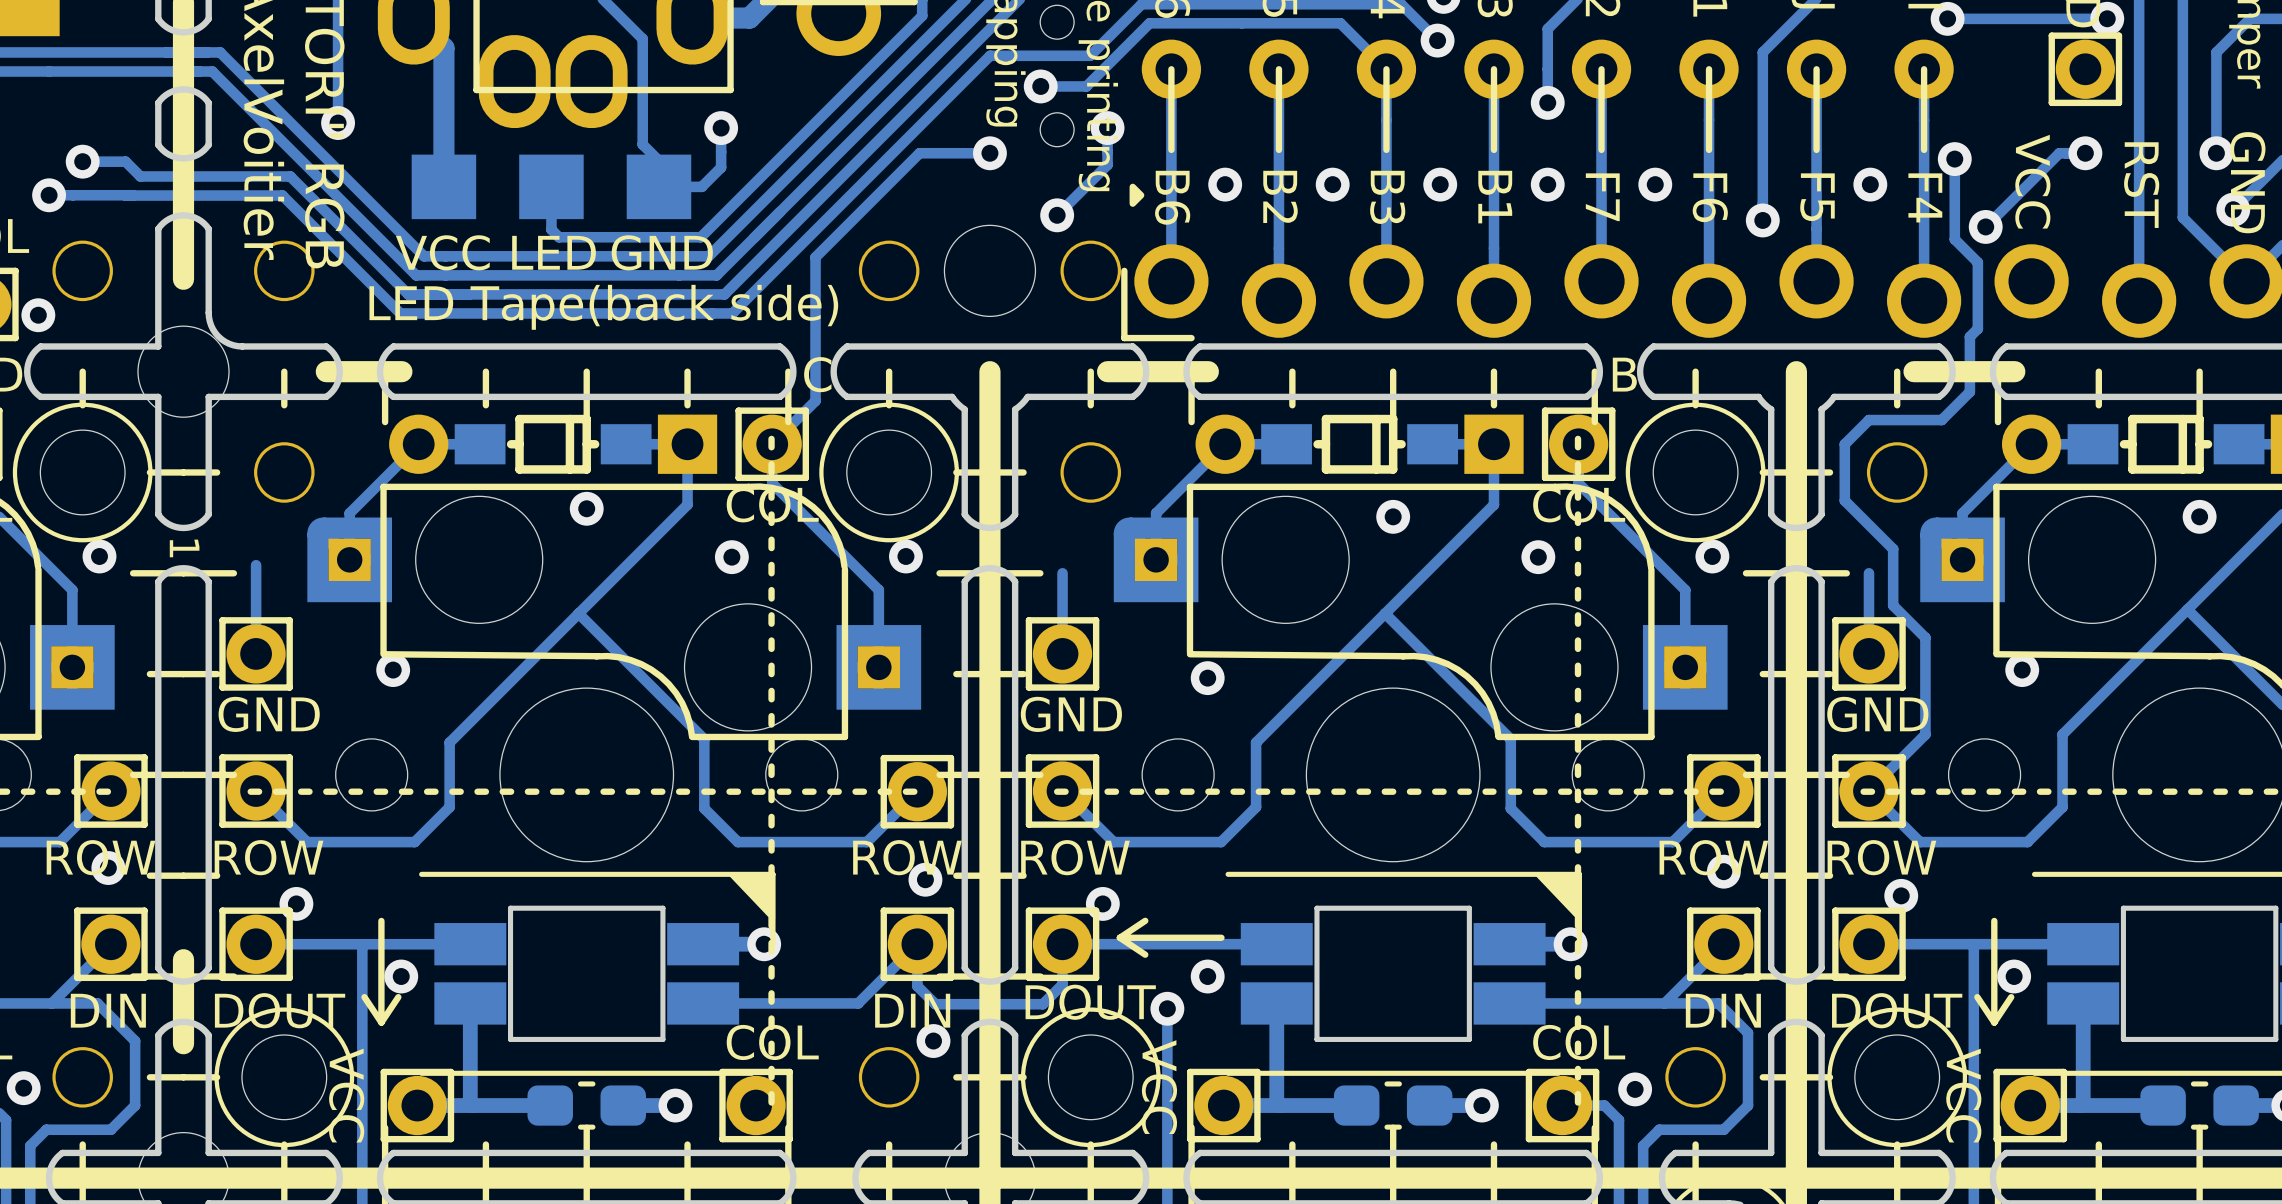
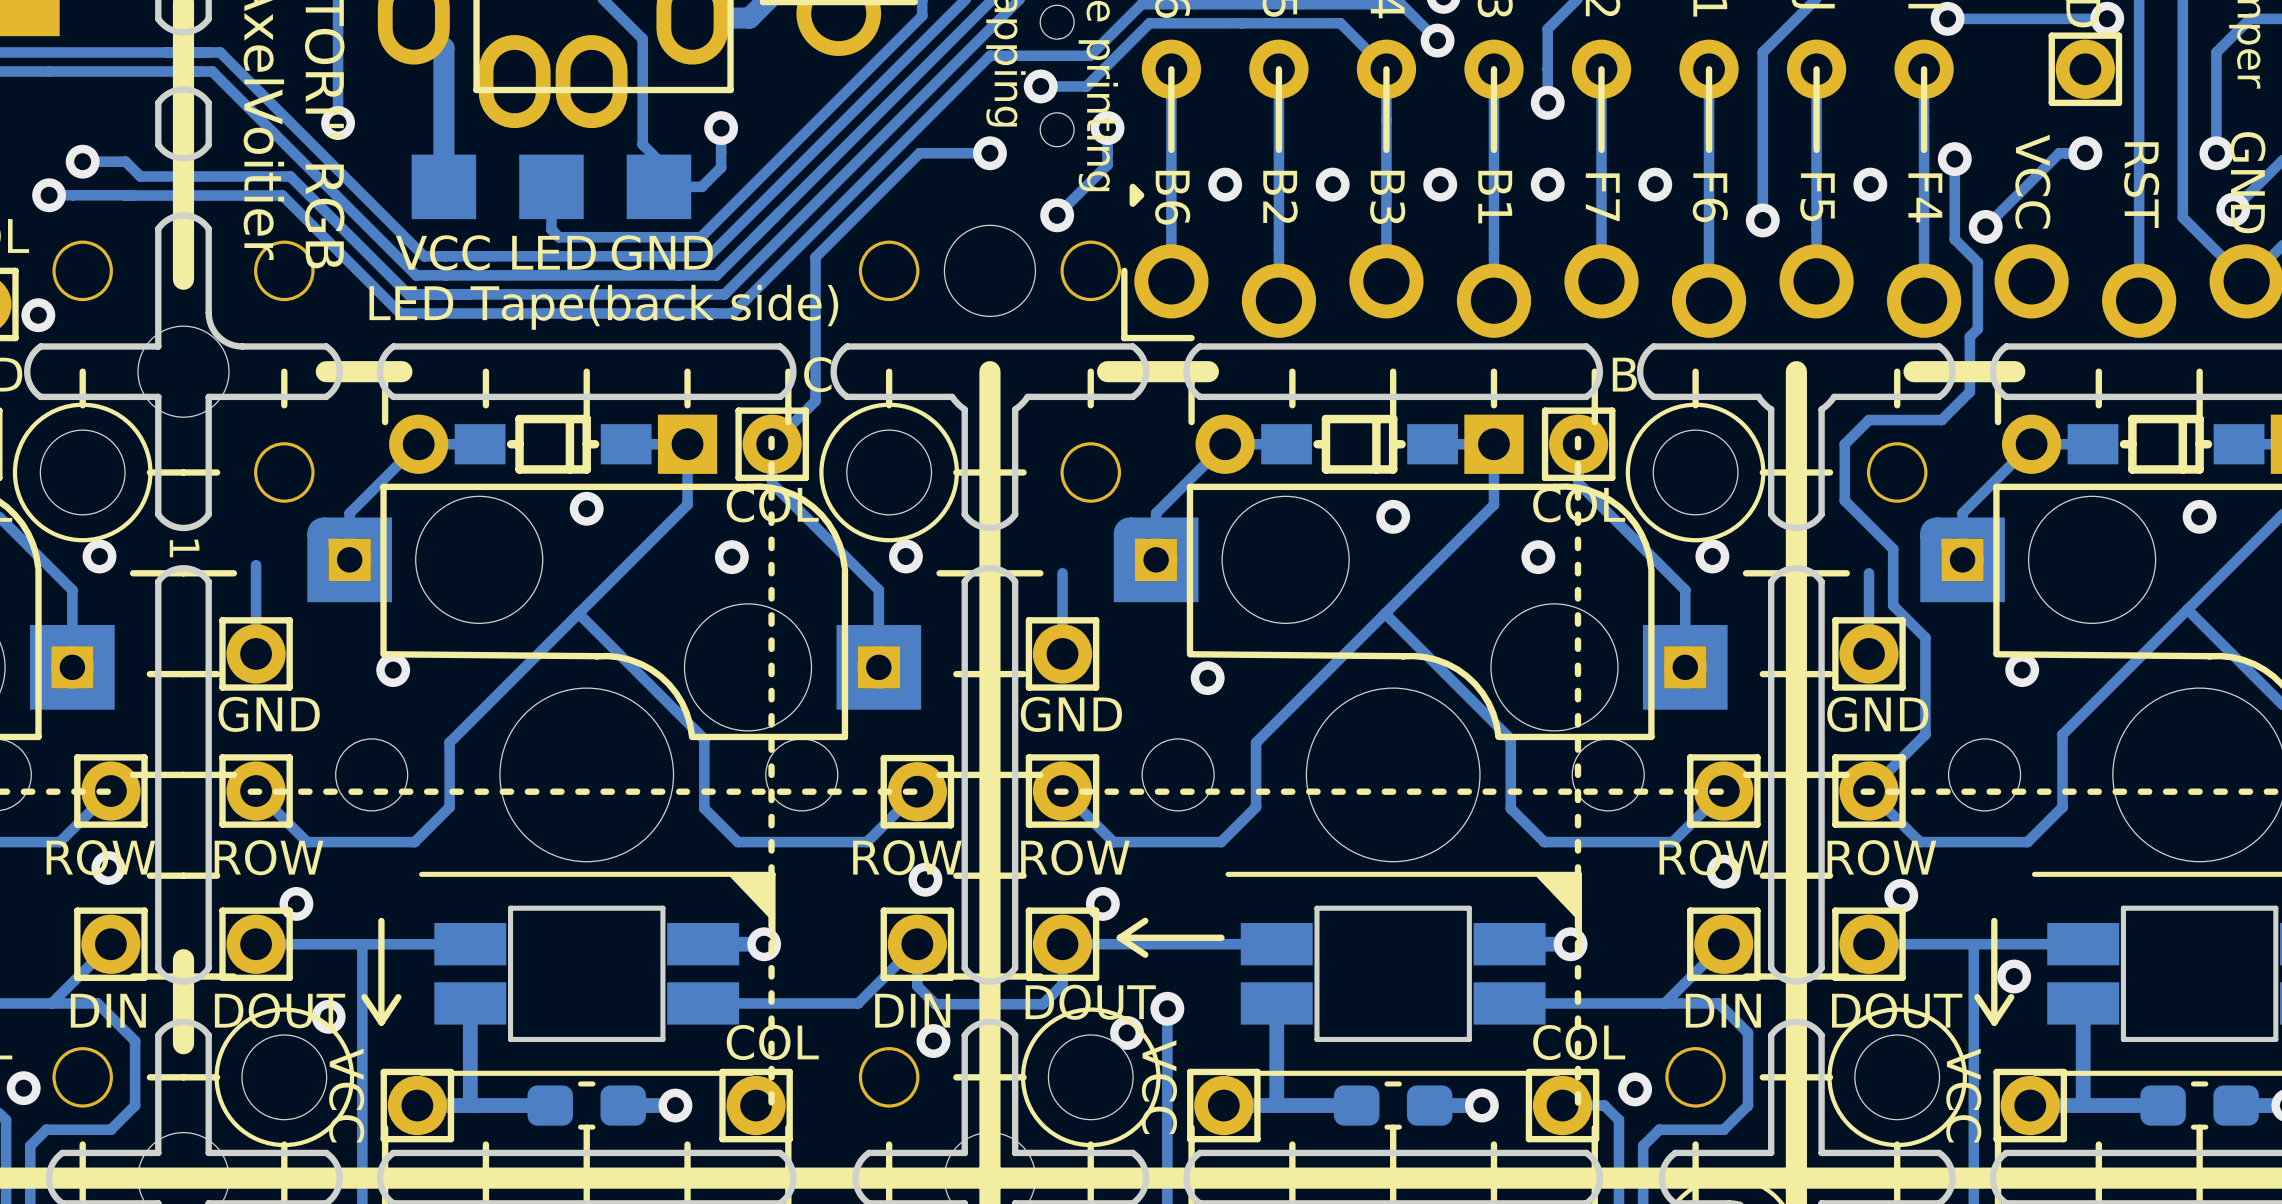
via position: (401, 976) -> (328, 1016)
via position: (1207, 976) -> (1127, 1032)

